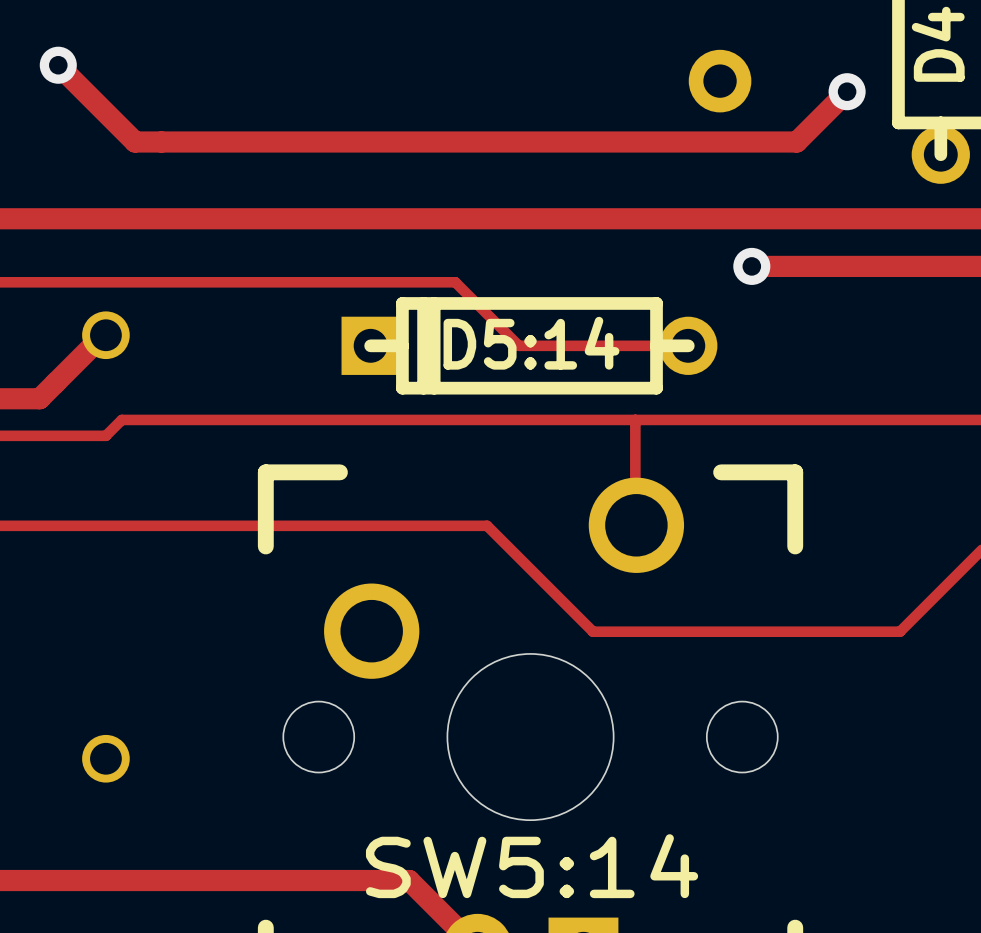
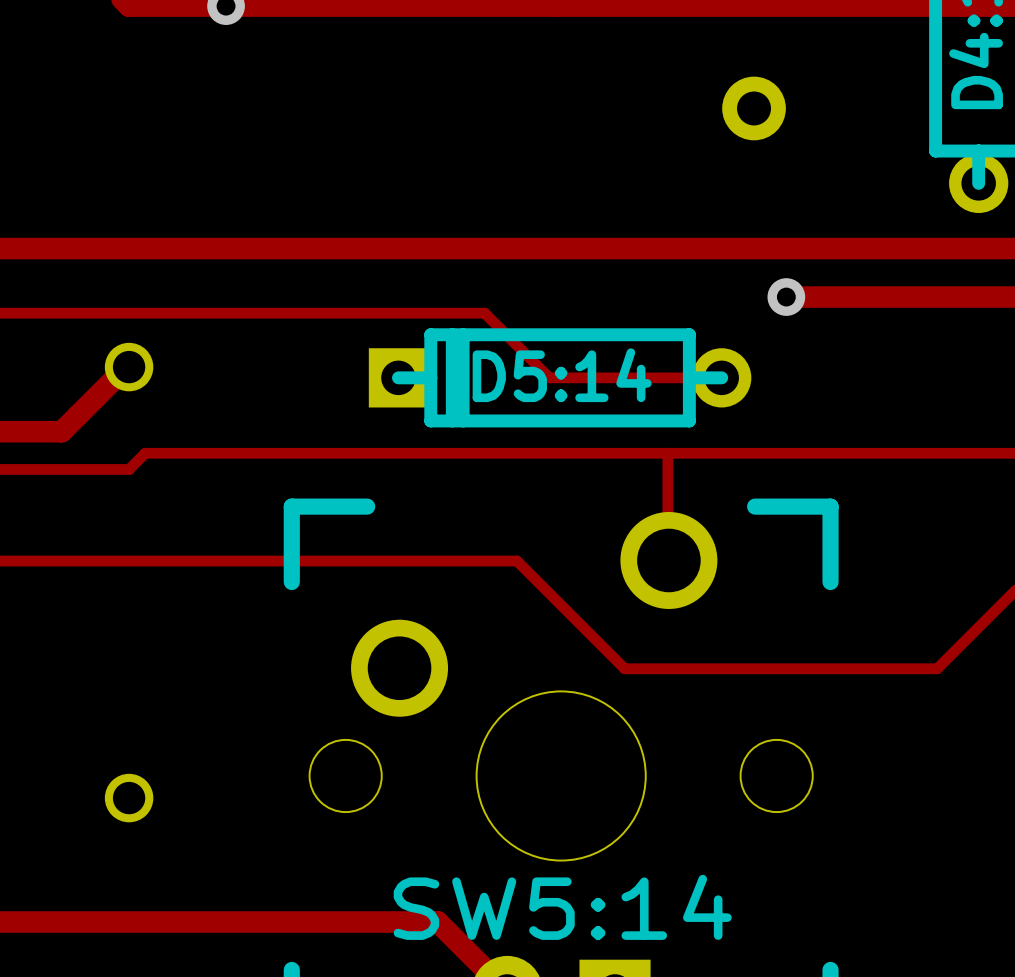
track: (58, 65) (135, 142) (796, 142) (847, 91) -> none
via: (58, 65) -> none
via: (847, 91) -> none

